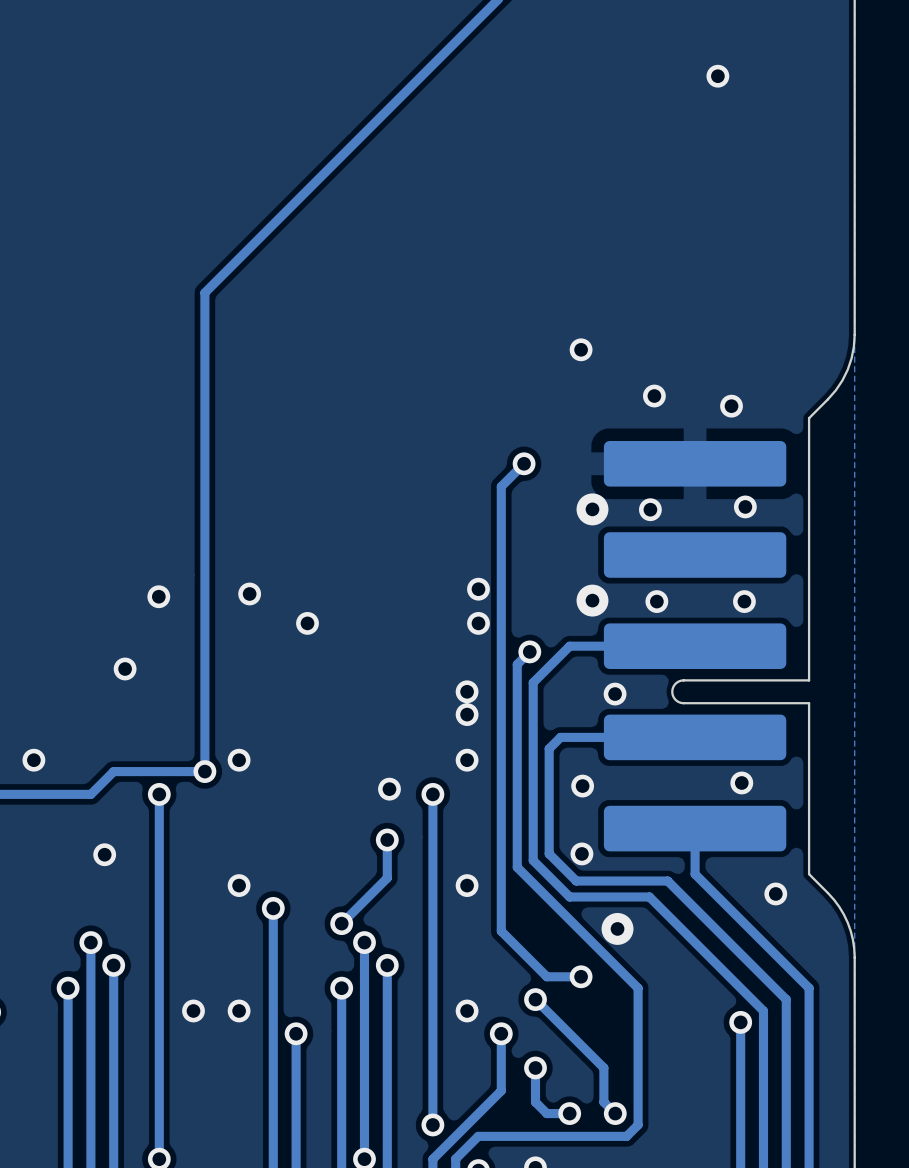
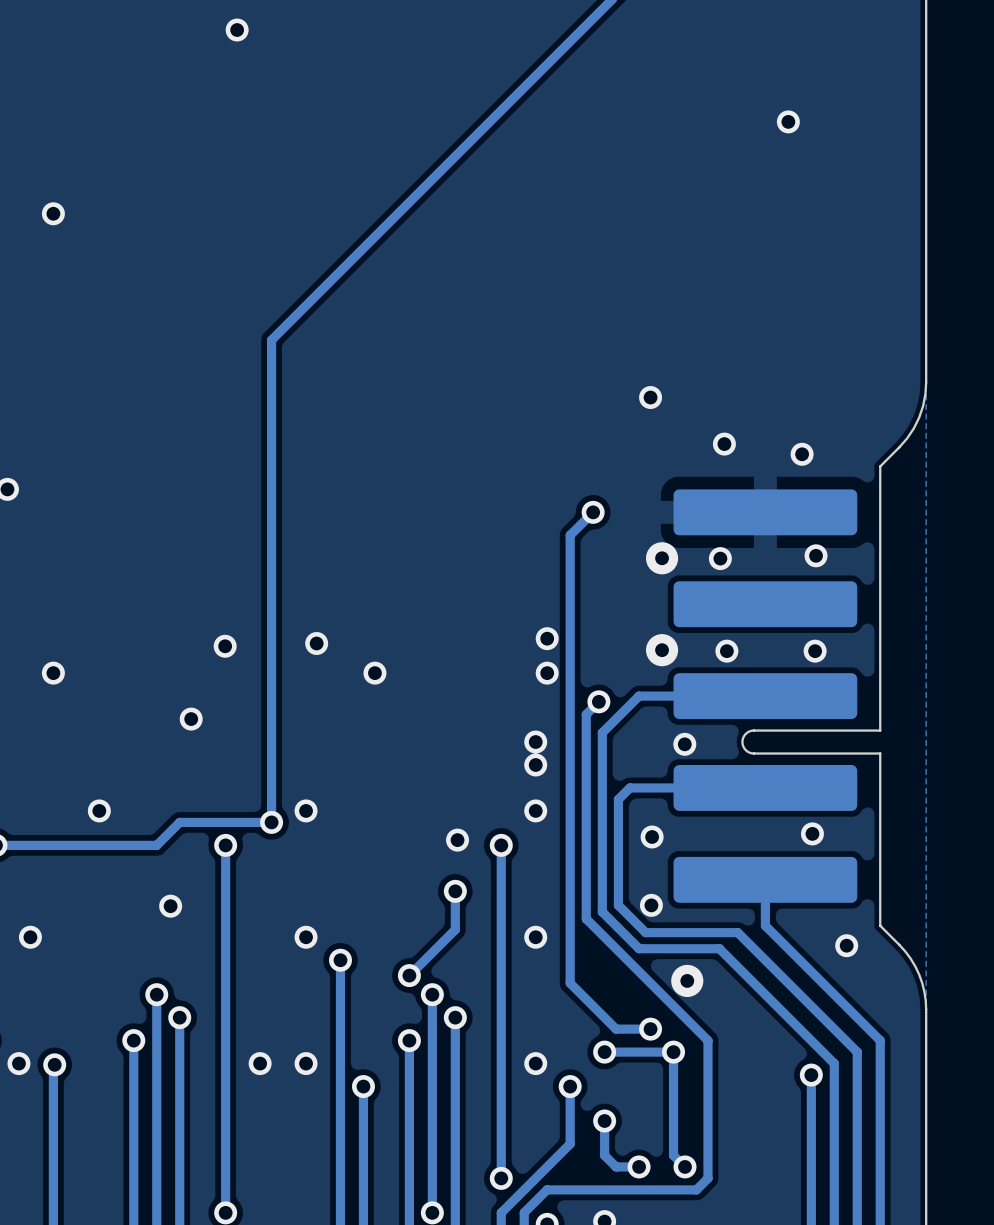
track: (535, 999) (603, 1067) -> (604, 1052) (673, 1052) (673, 1121)
via: none -> (673, 1052)

